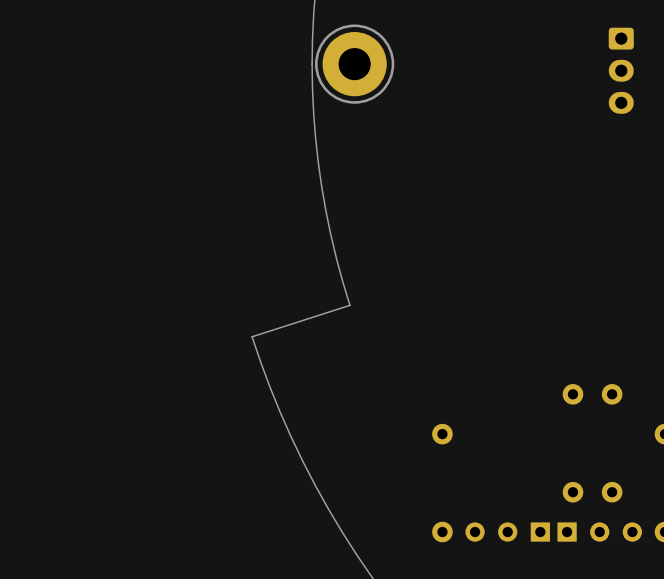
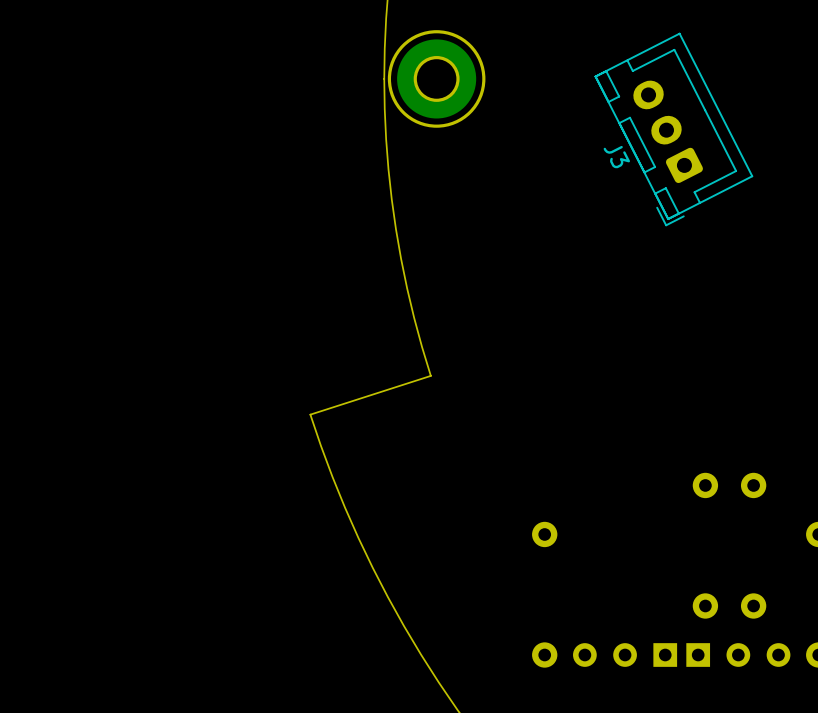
J3 side: top (621, 70) -> bottom (673, 129)

